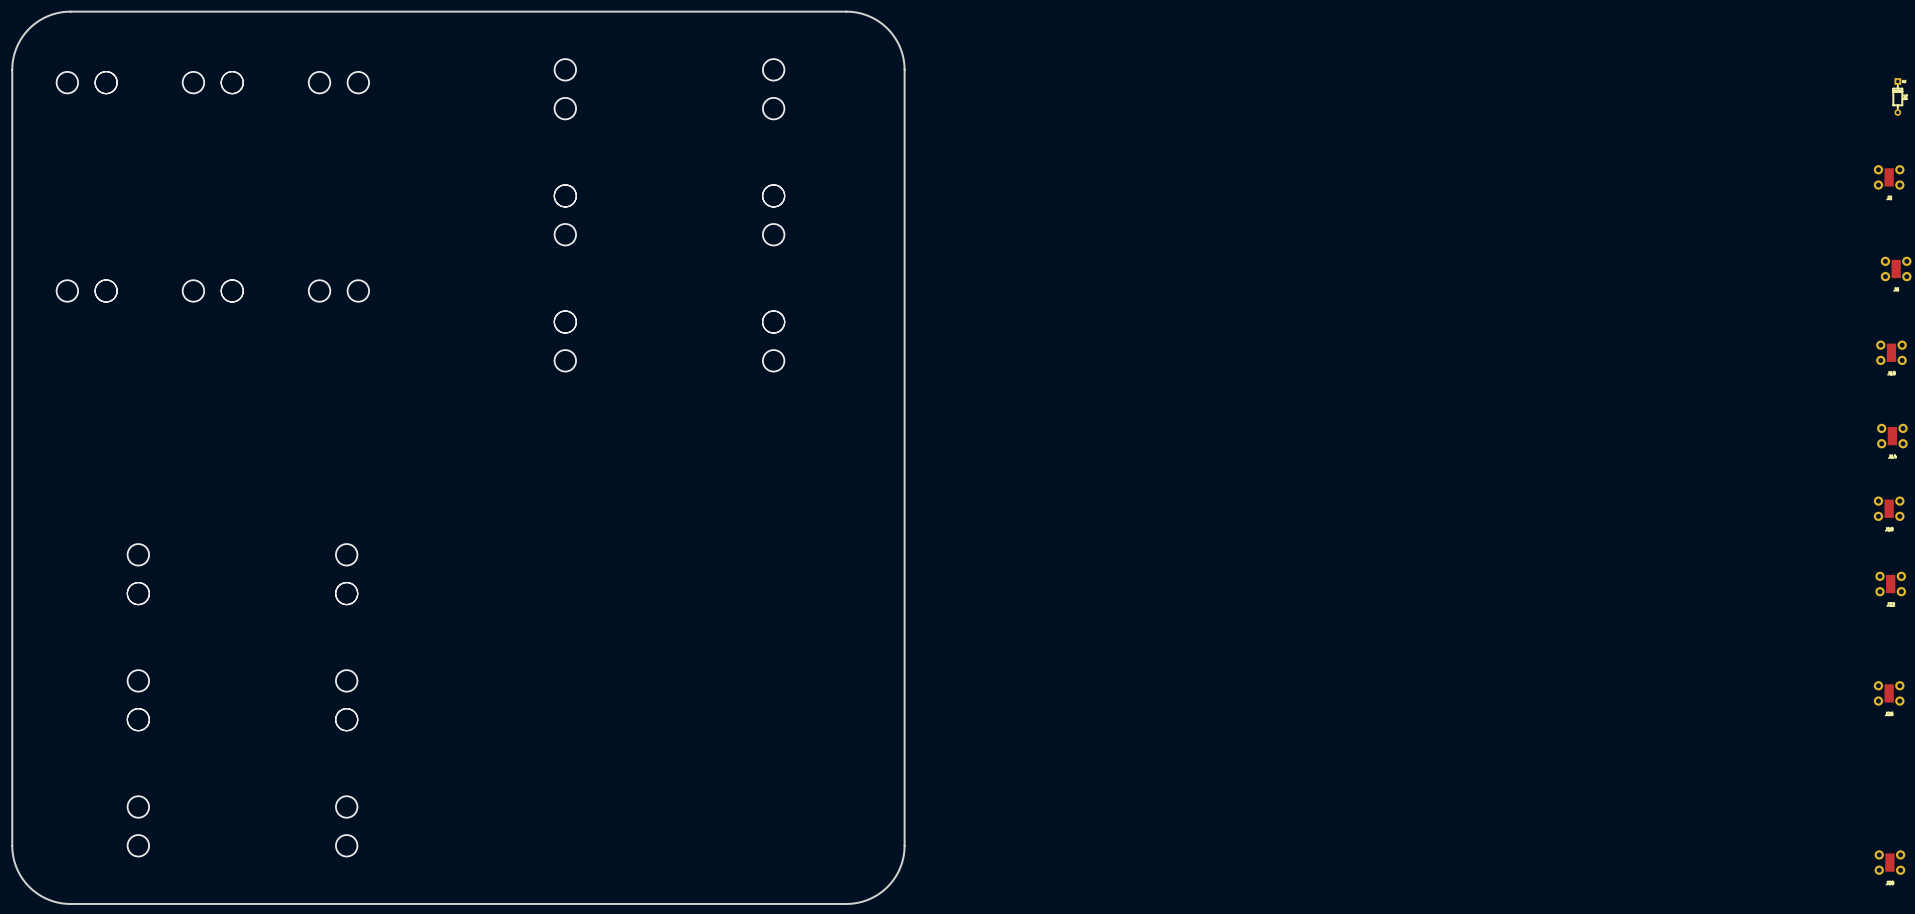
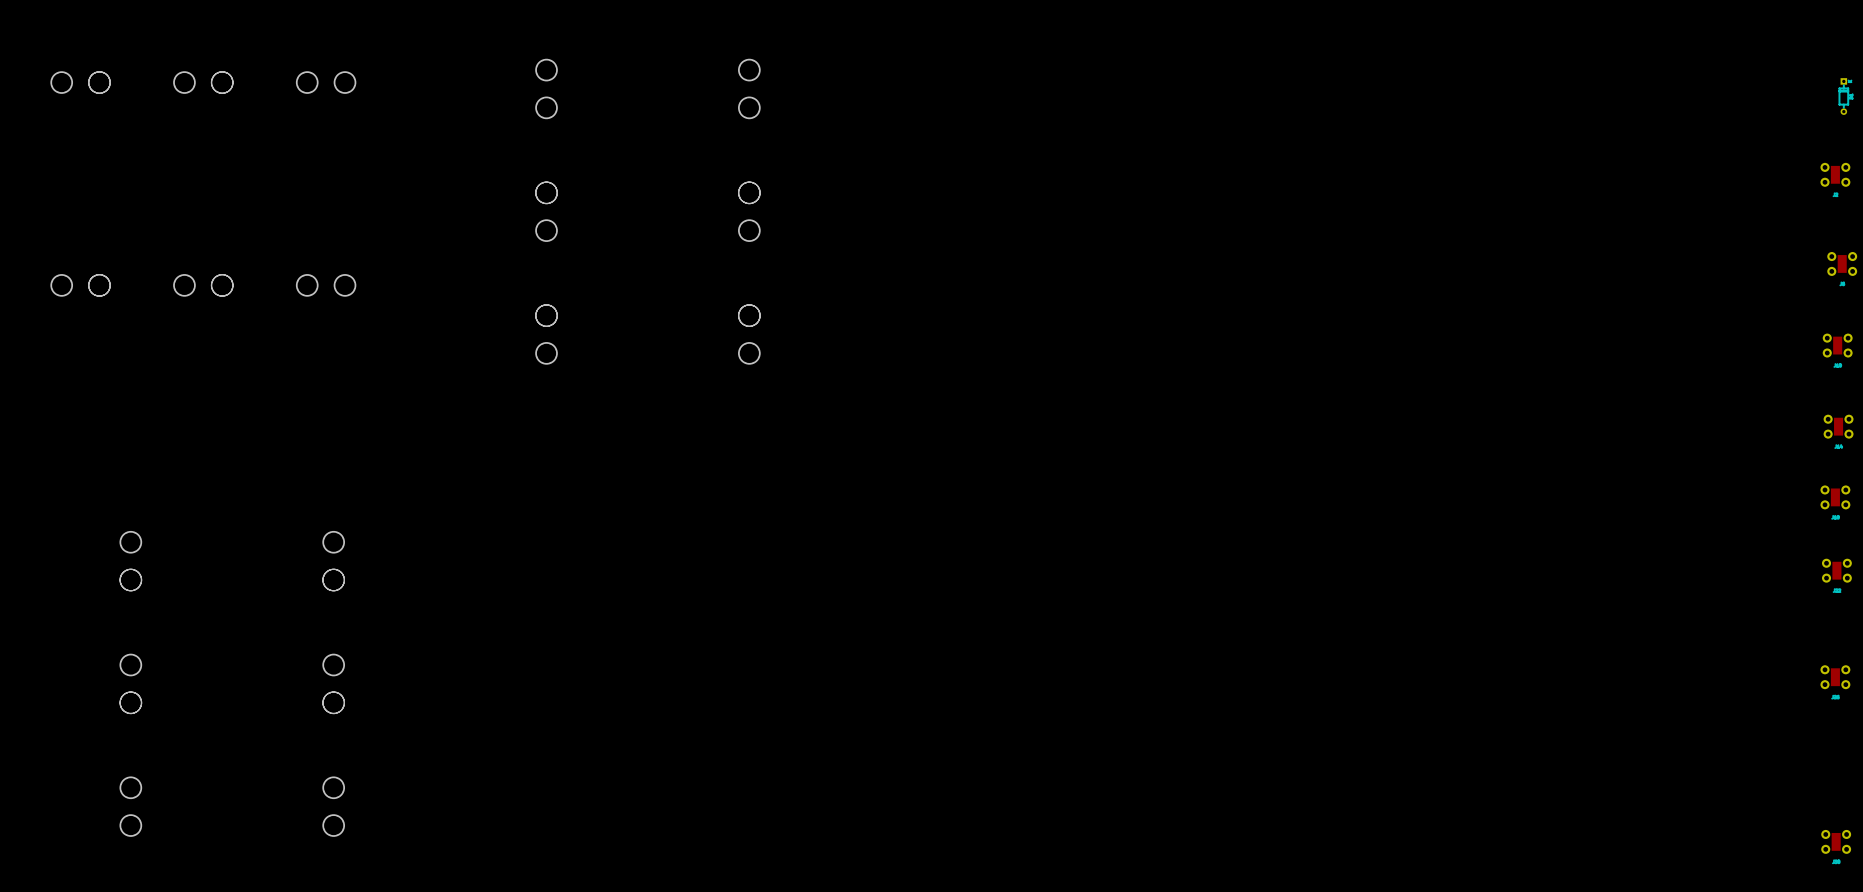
board edge: (70, 11) (846, 11) (871, 17) (889, 31) (901, 50) (904, 69) (904, 845) (898, 871) (885, 889) (865, 900) (846, 903) (70, 903) (45, 898) (27, 884) (15, 864) (12, 845) (12, 66) (18, 44) (29, 28) (48, 16) (70, 11) -> none

